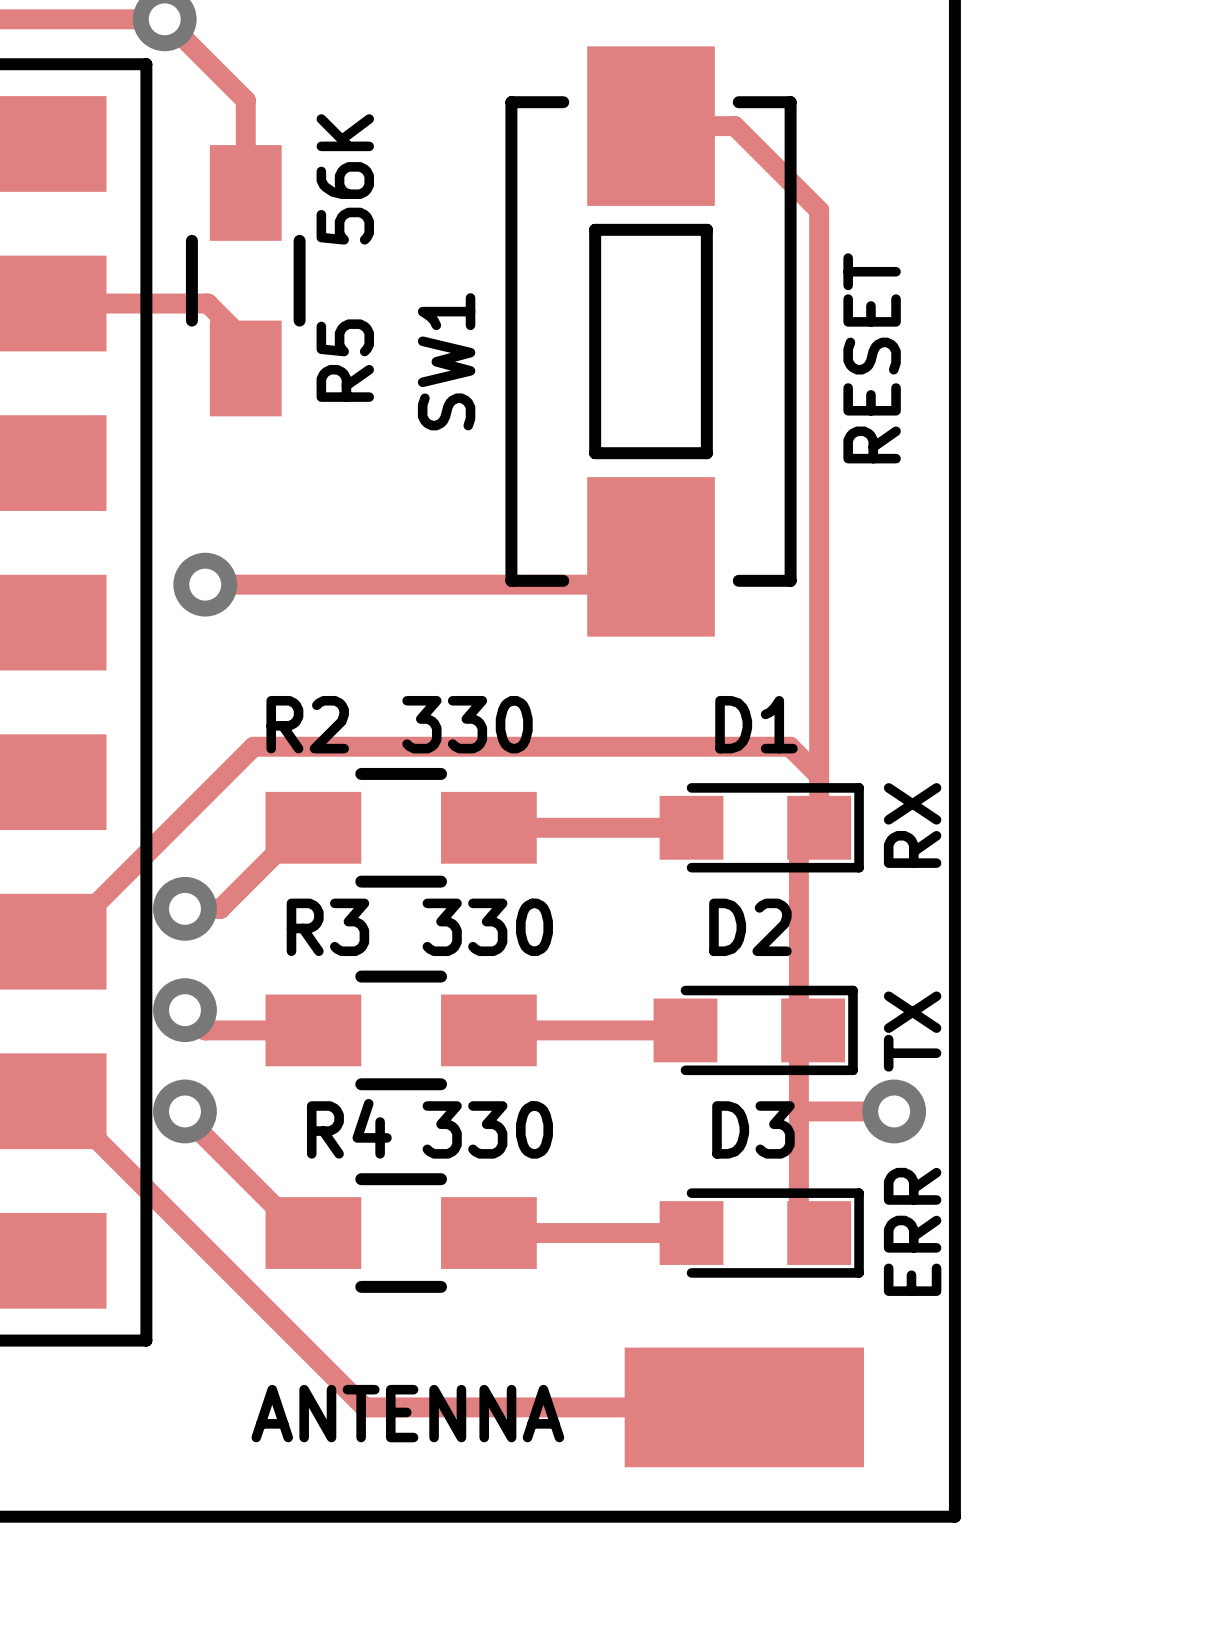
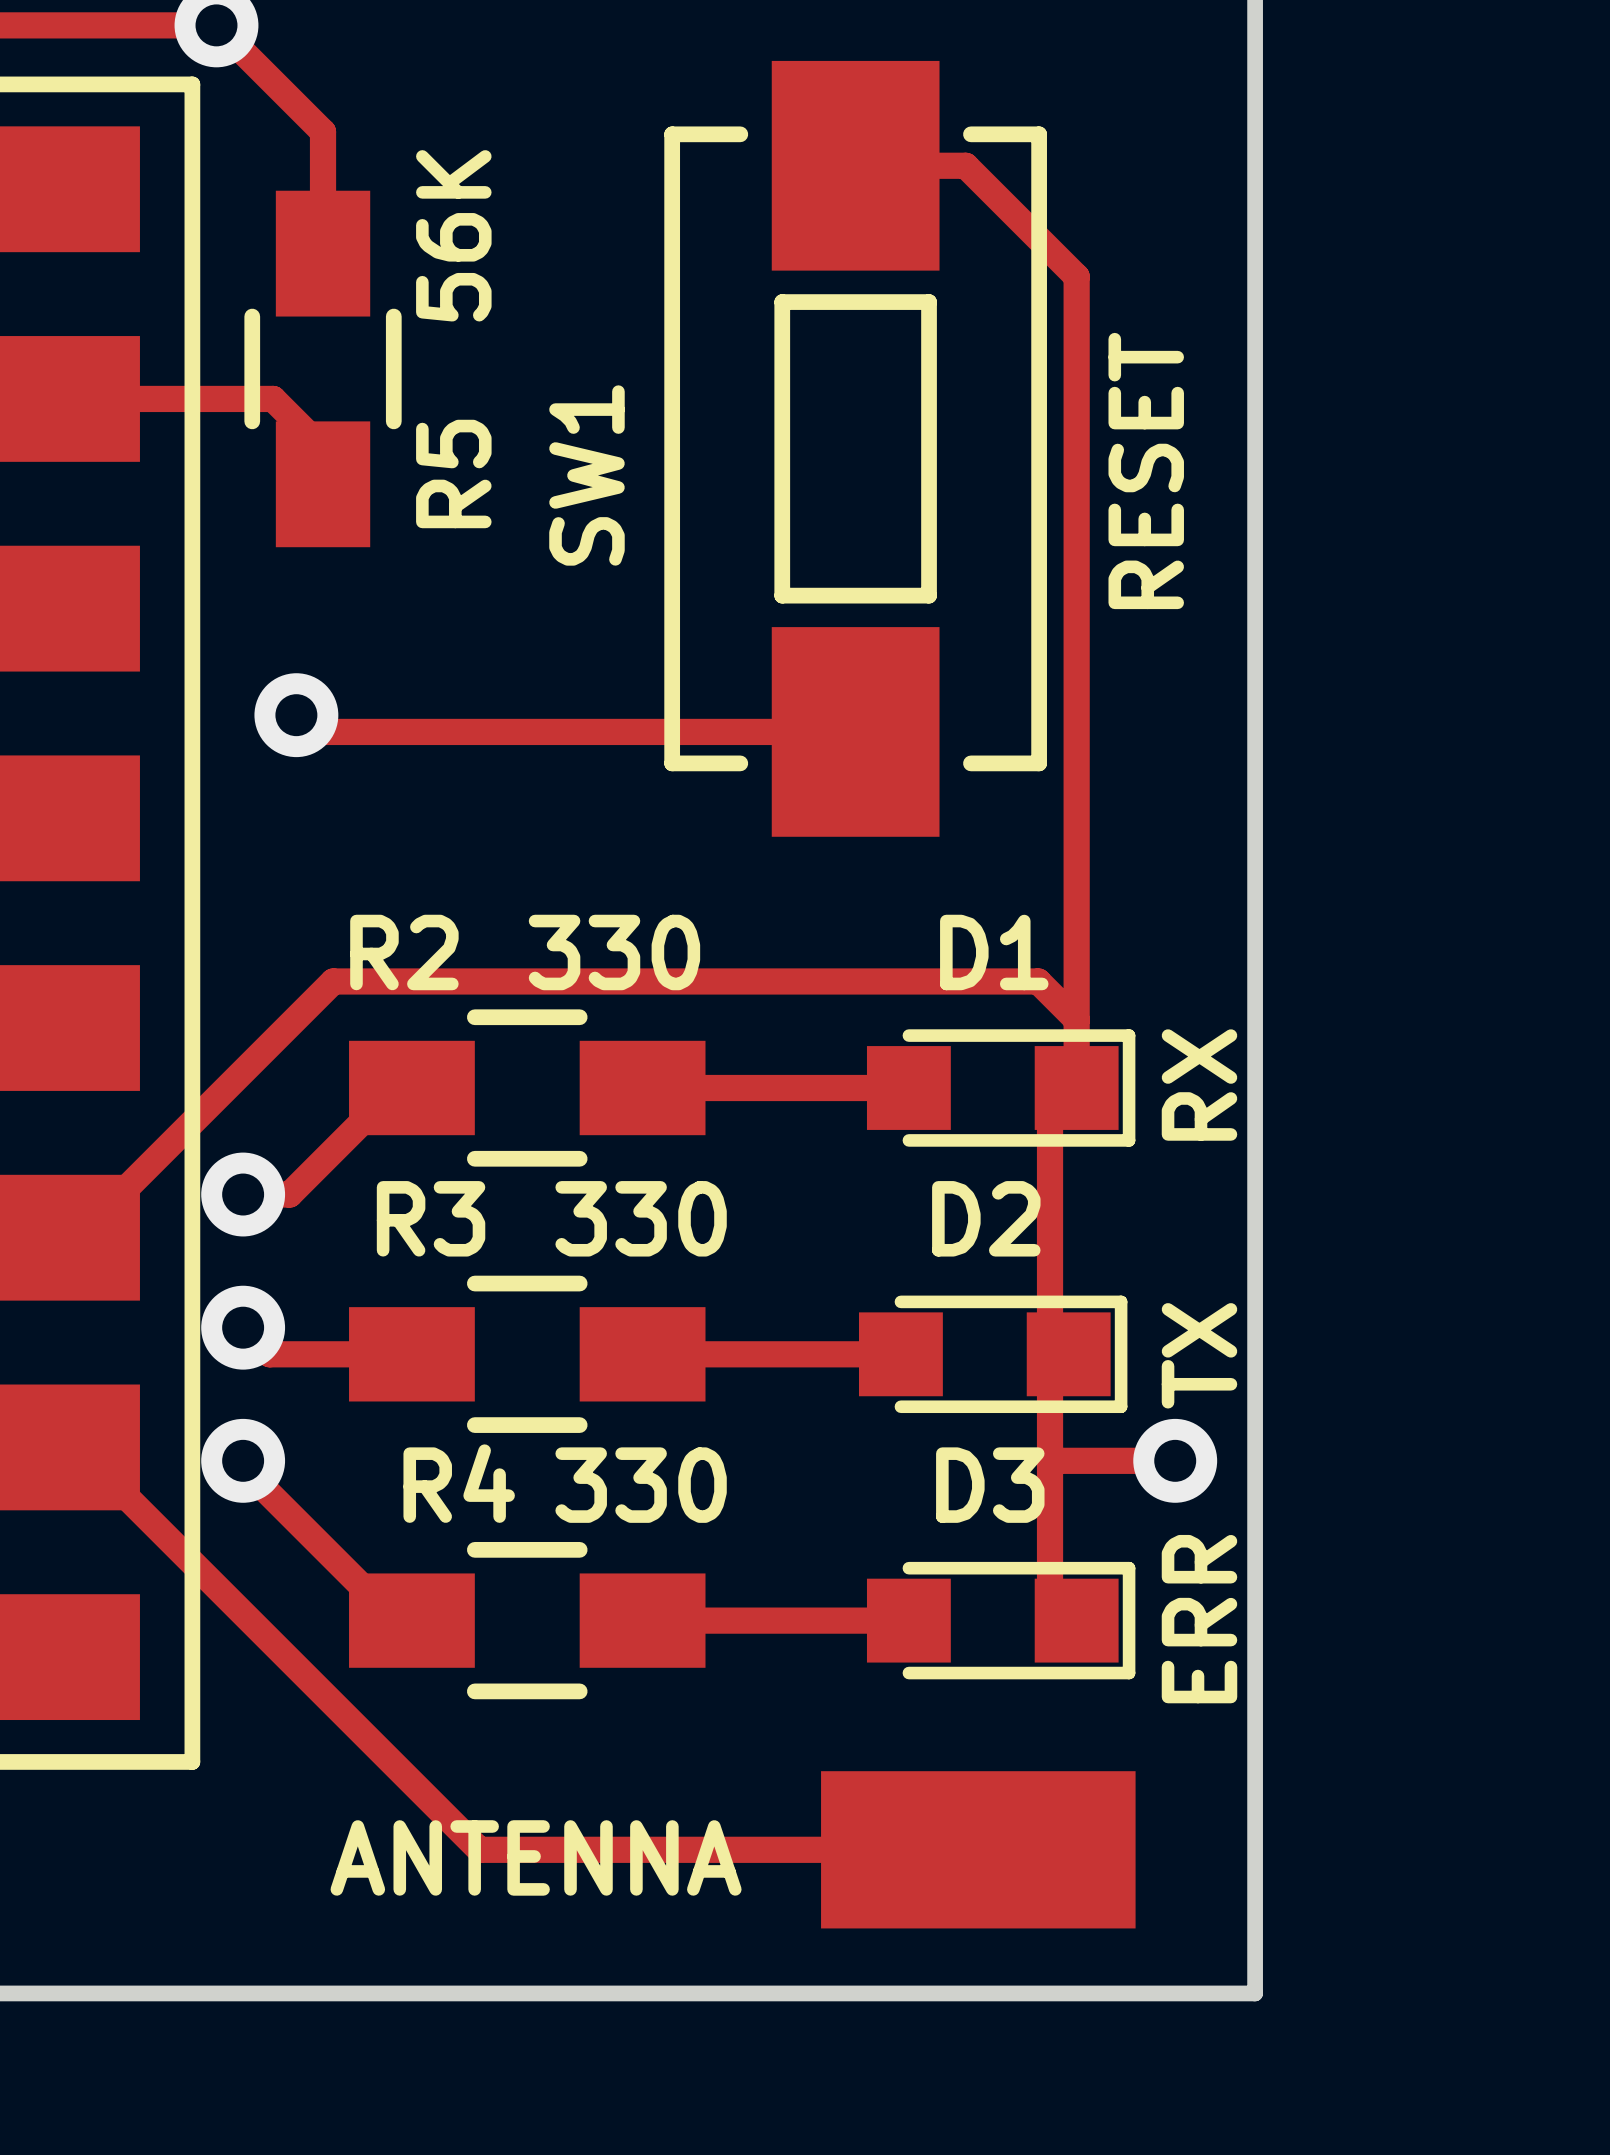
track: (651, 556) (623, 584) (205, 584) -> (855, 731) (313, 731) (296, 715)
via position: (205, 584) -> (296, 715)

